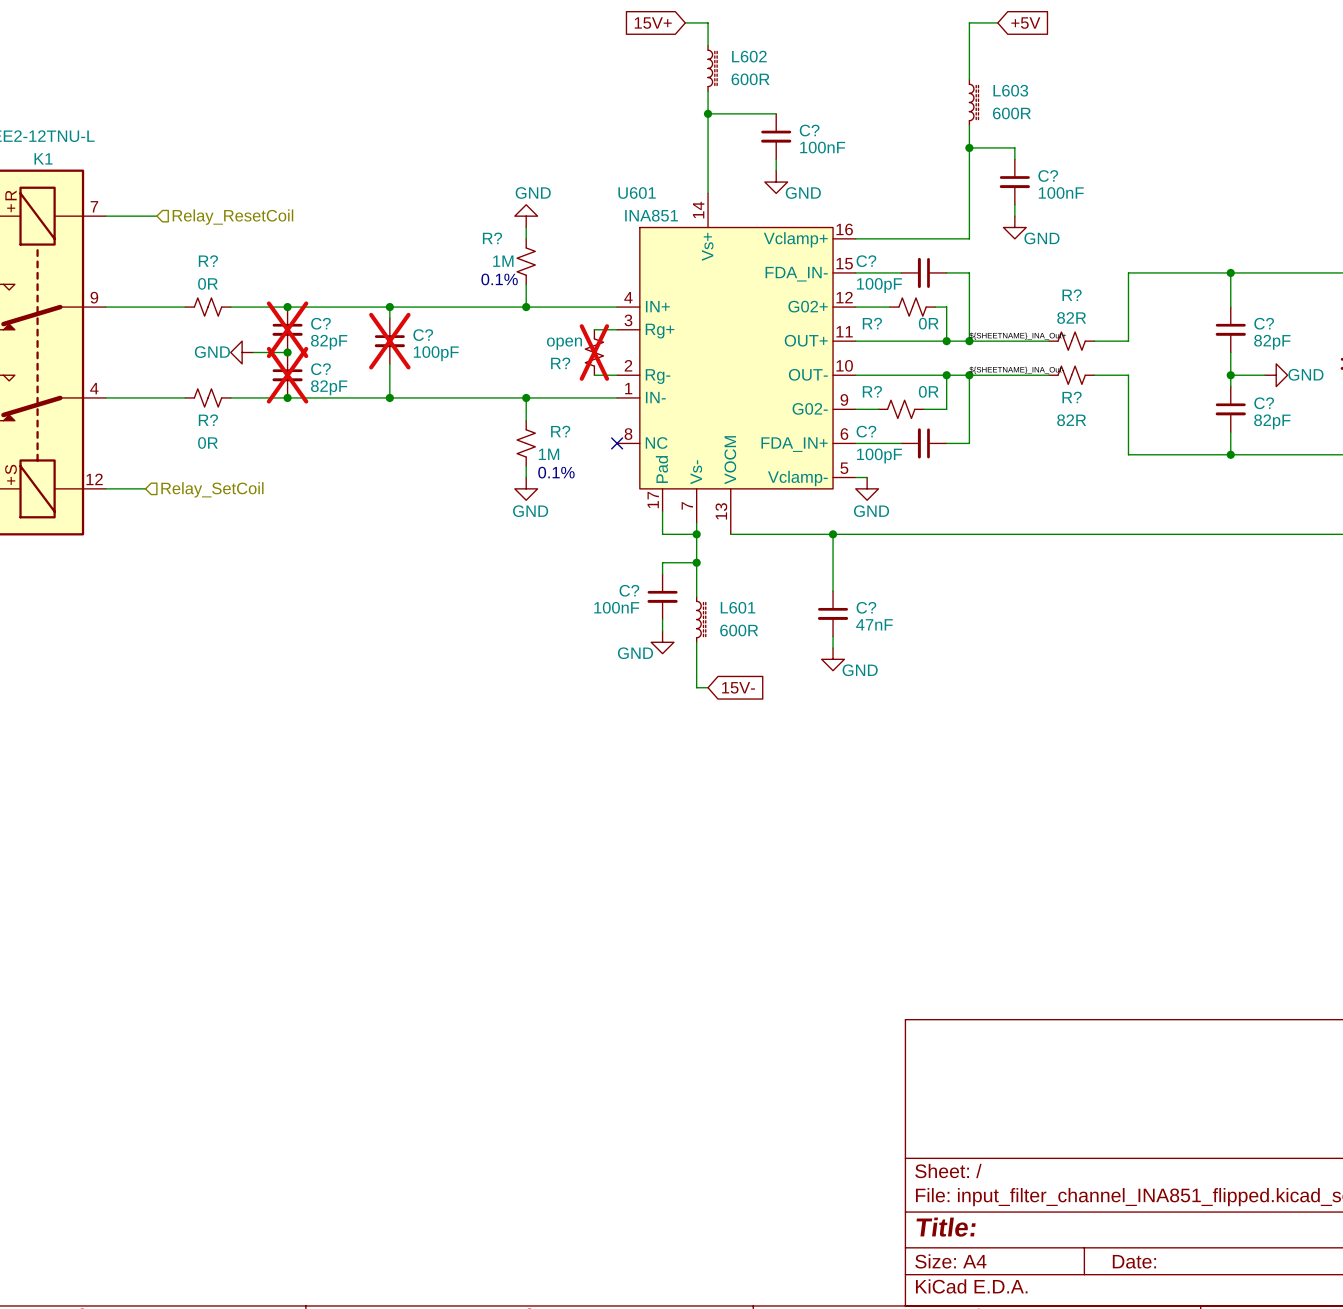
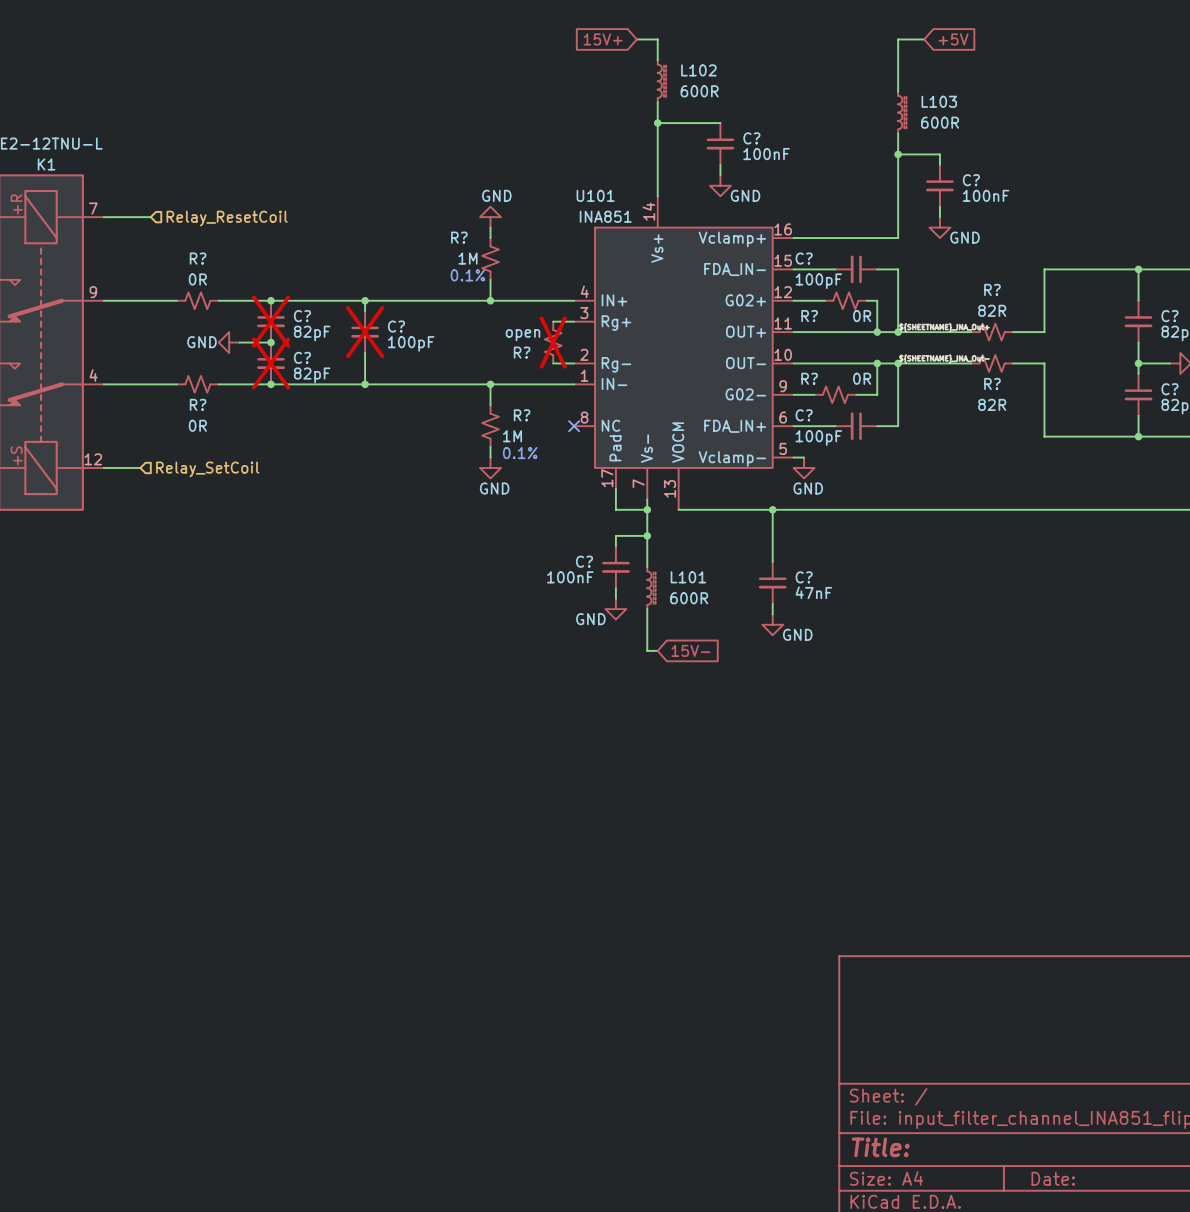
L602 name: L602 (749, 56) -> L102 (698, 70)
L603 name: L603 (1010, 90) -> L103 (939, 101)
U601 name: U601 (637, 192) -> U101 (595, 195)
L601 name: L601 (738, 607) -> L101 (688, 577)

